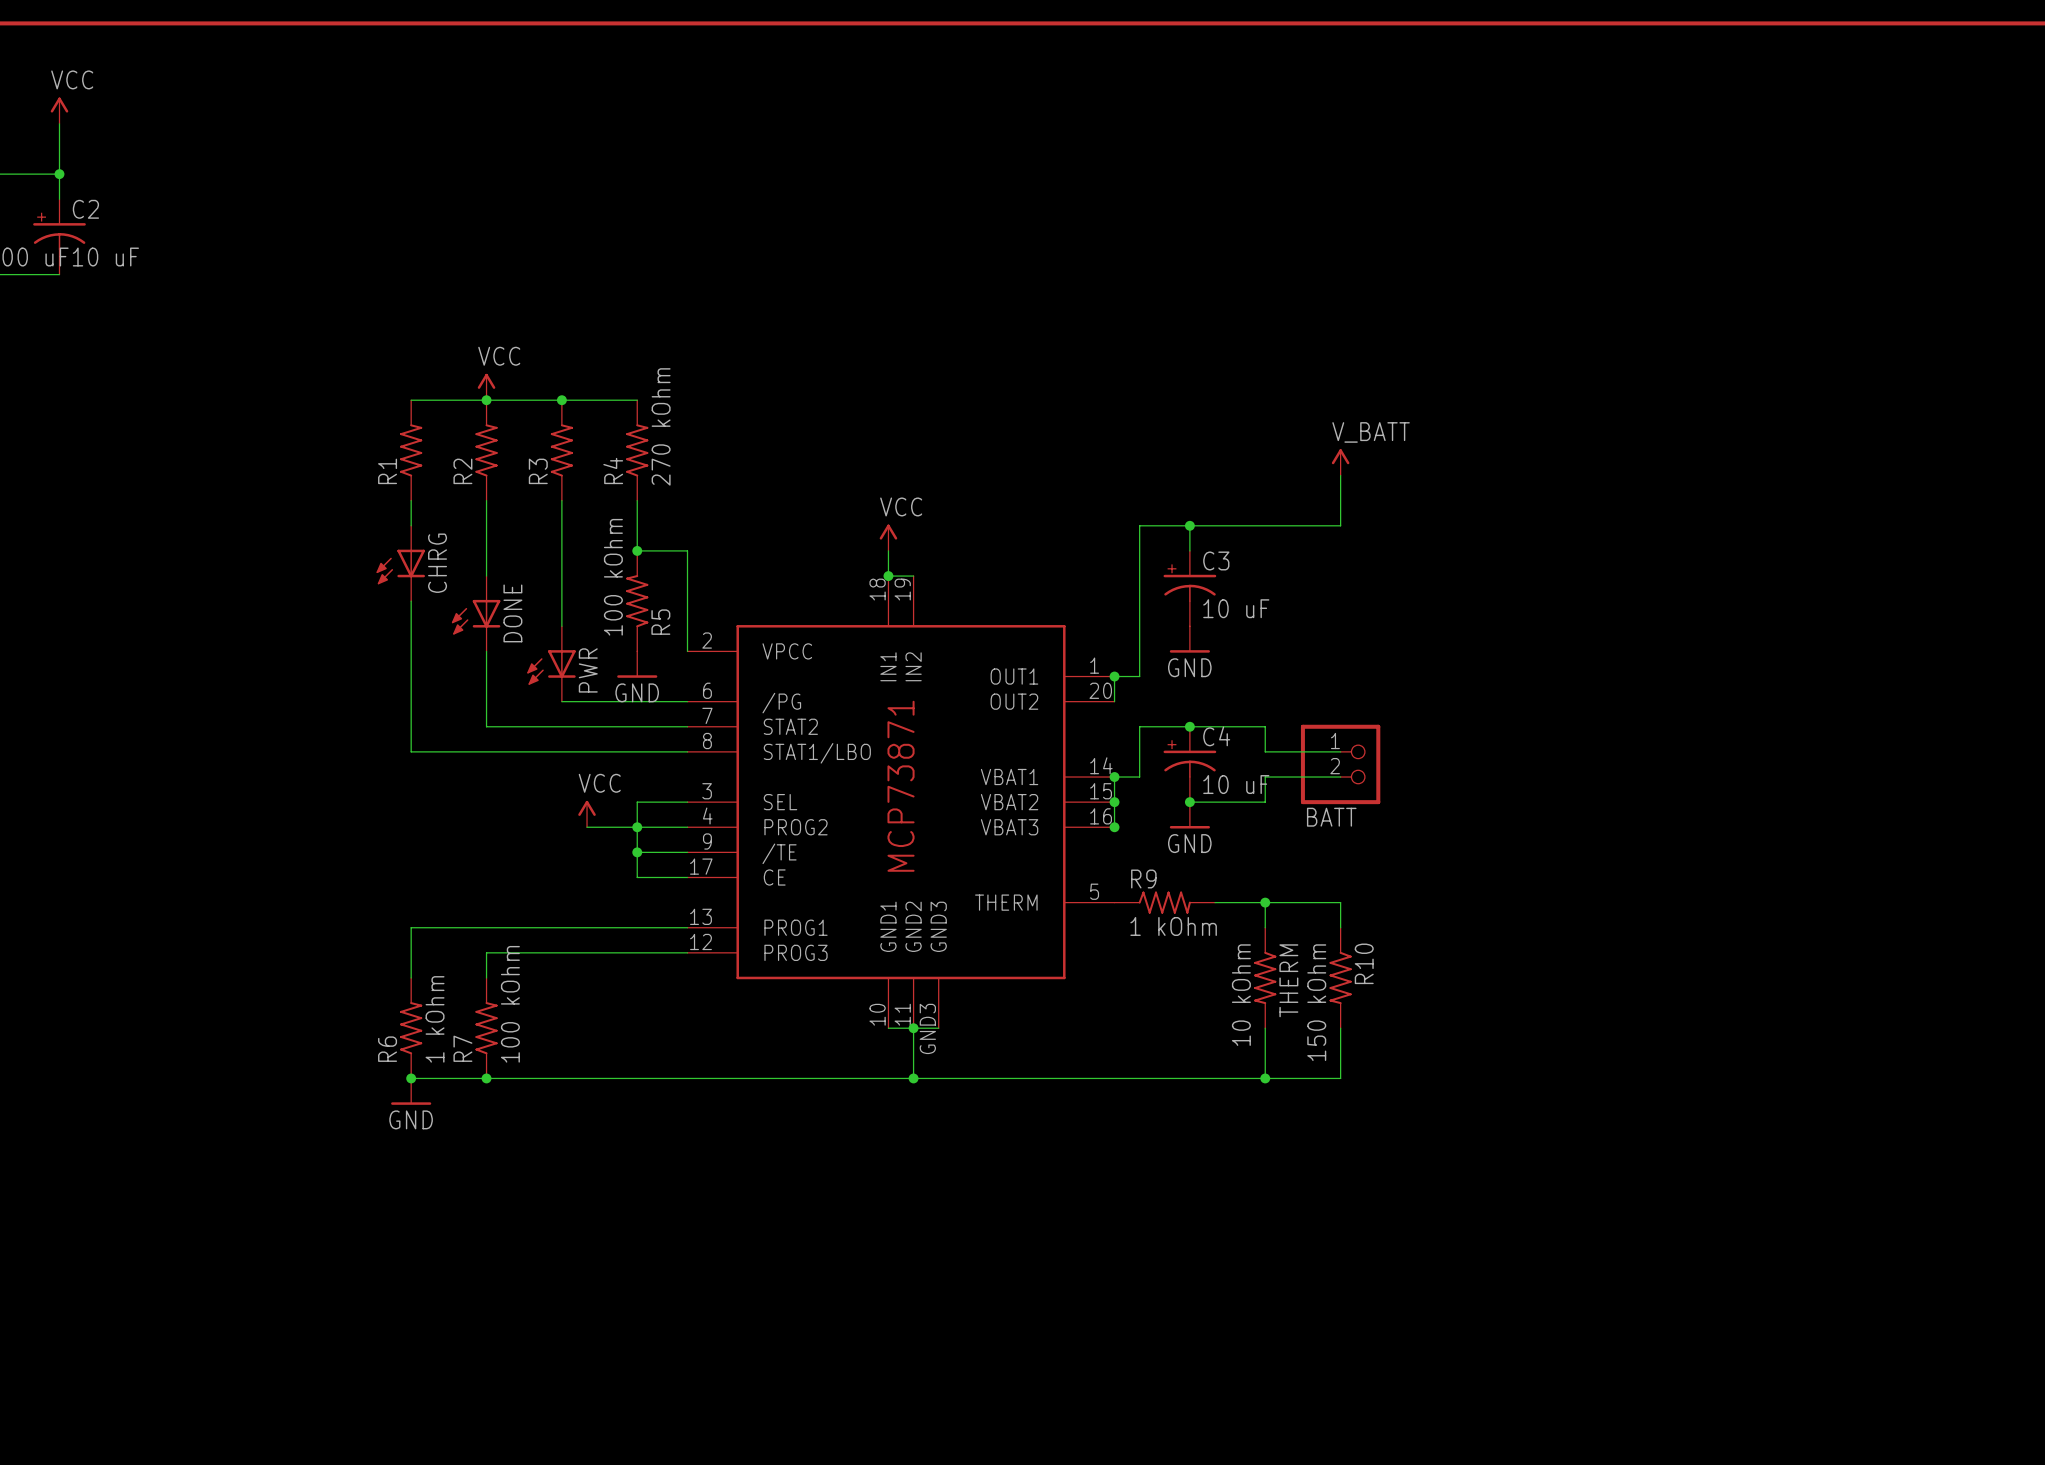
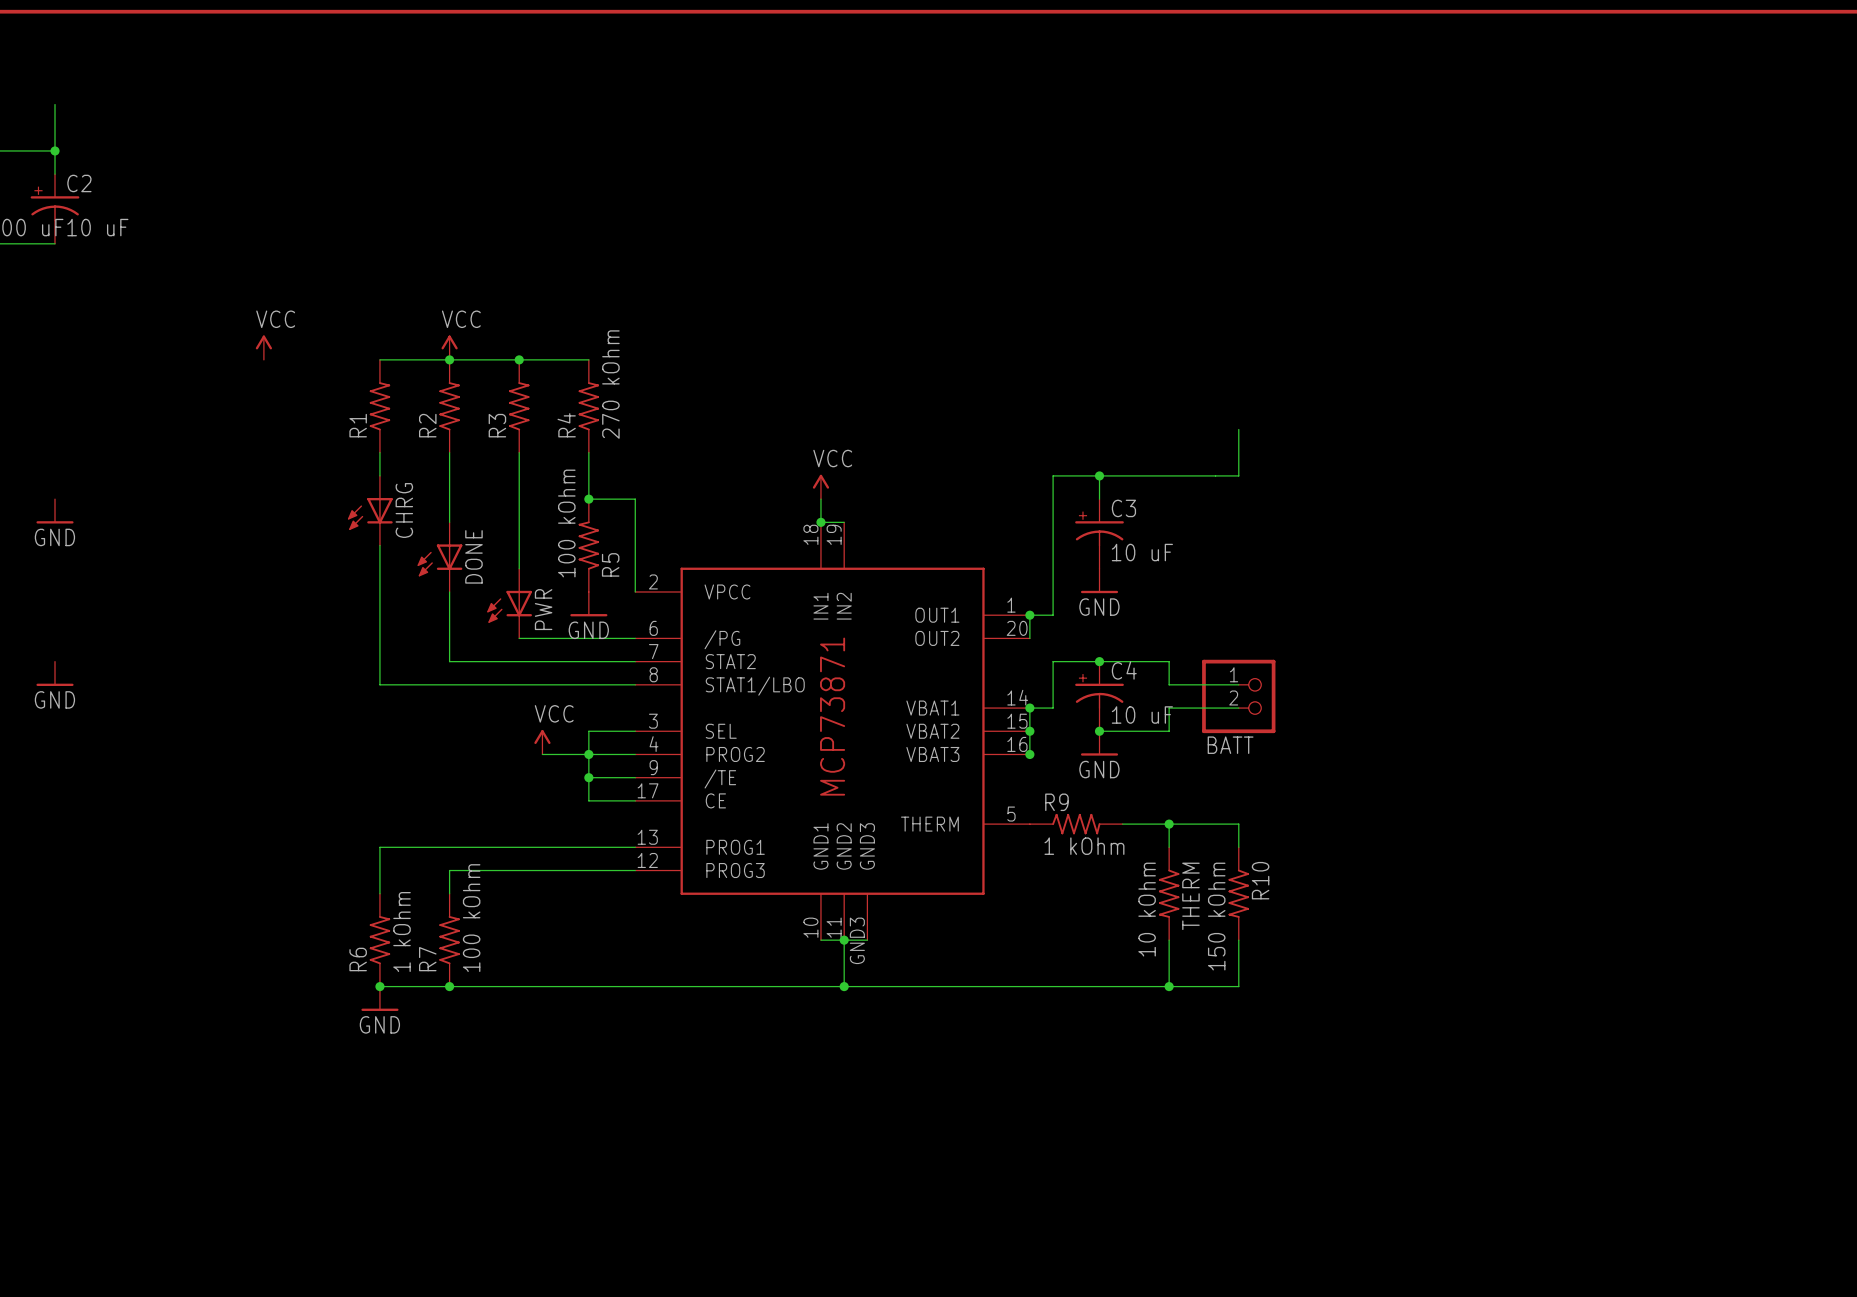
power symbol: VCC (59, 110) -> none
power symbol: none -> VCC (263, 347)
power symbol: V_BATT (1340, 462) -> none
power symbol: none -> GND (55, 511)
power symbol: none -> GND (55, 673)

